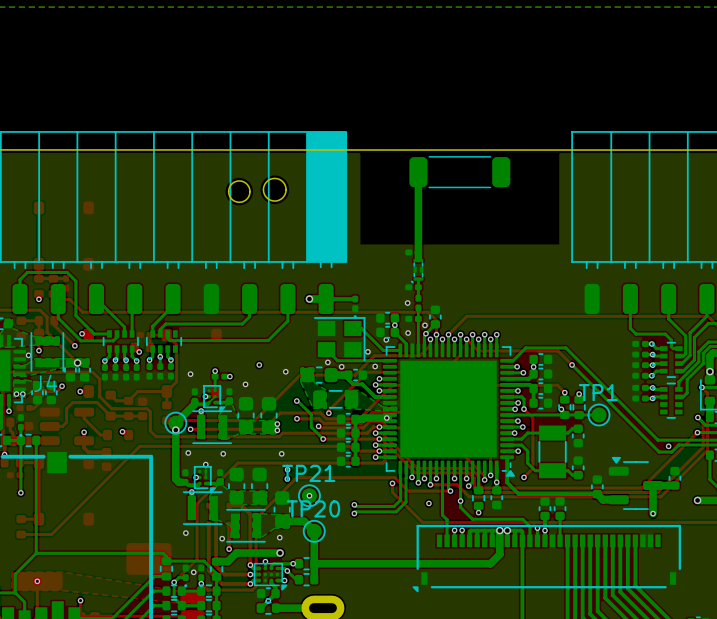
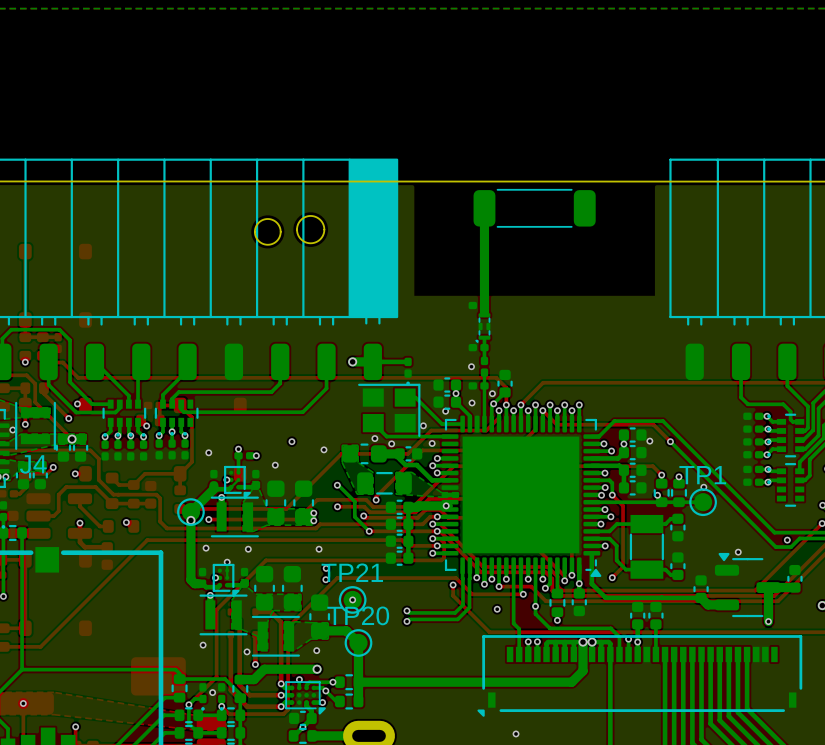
via: none -> (649, 441)
via: none -> (703, 487)
via: none -> (738, 552)
via: none -> (516, 733)

